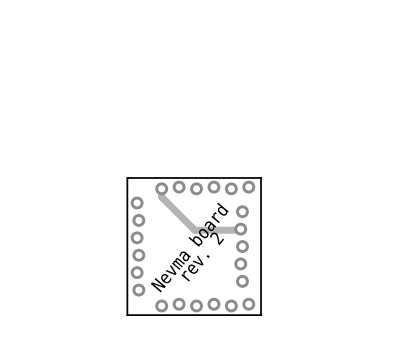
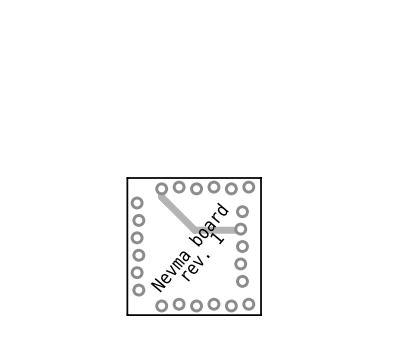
text: rev. 2 (202, 256) -> rev. 1 (202, 257)

